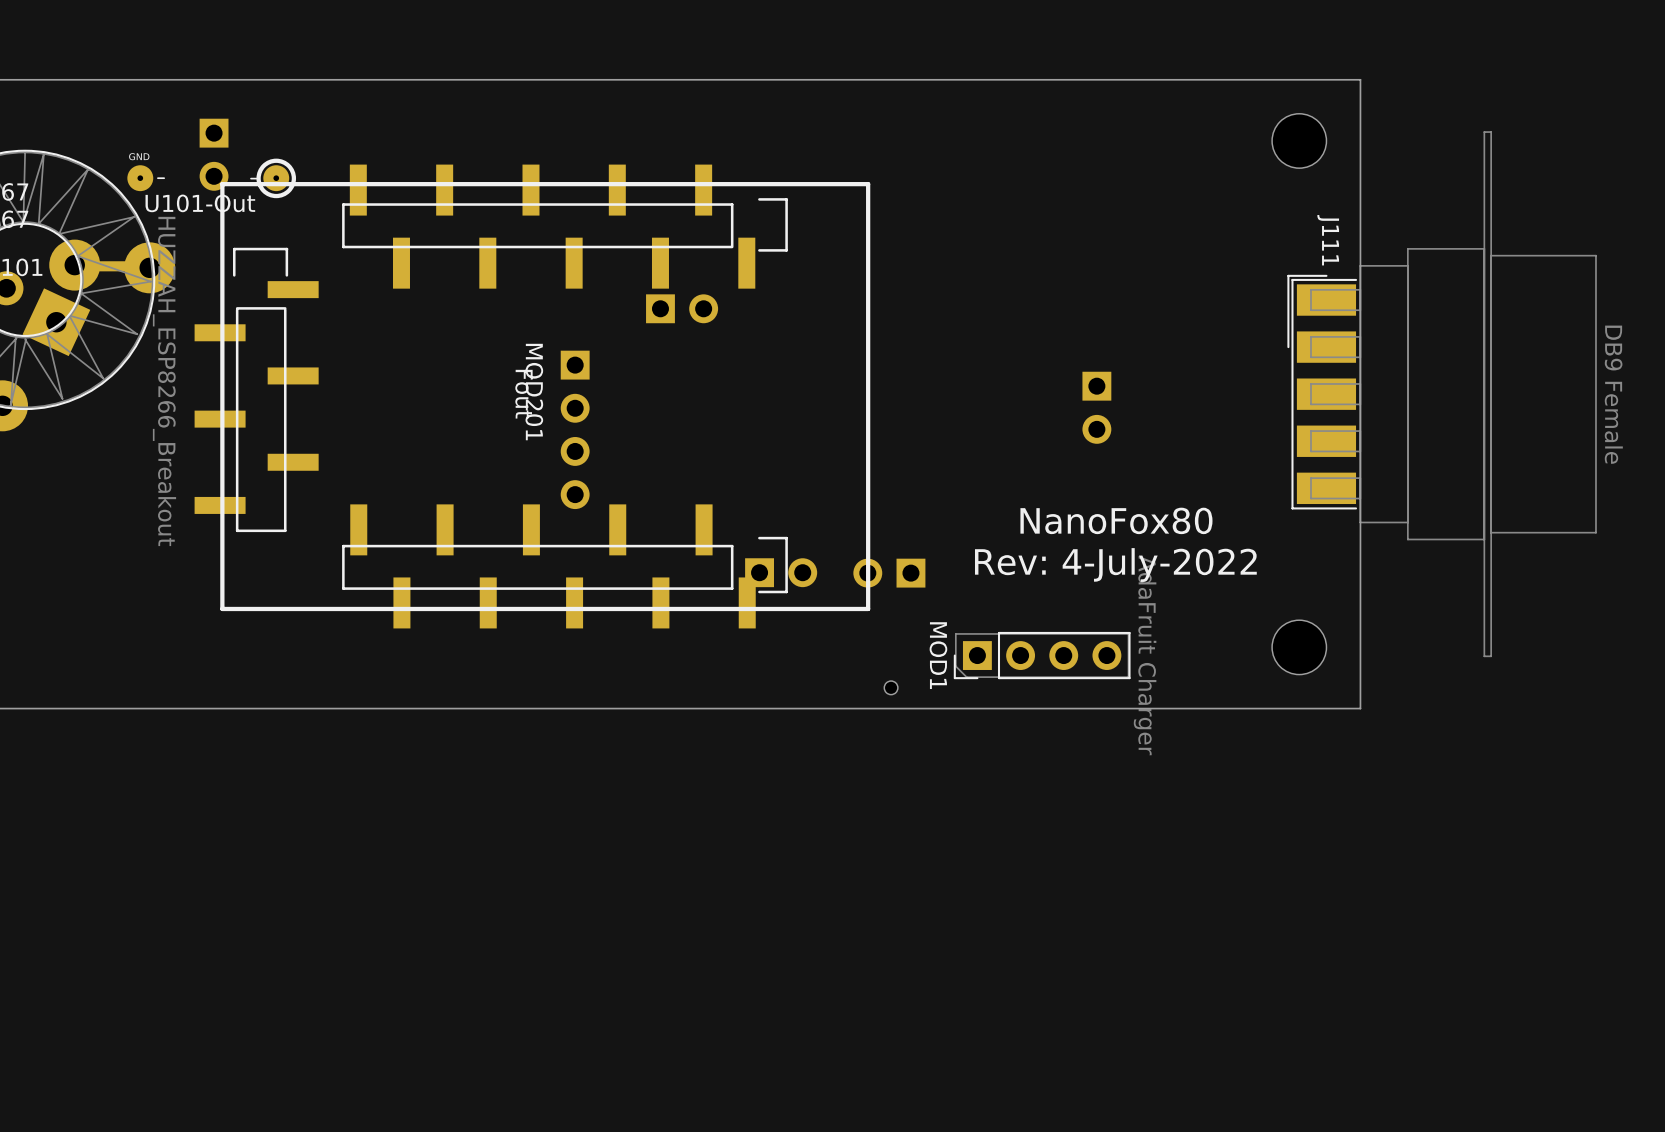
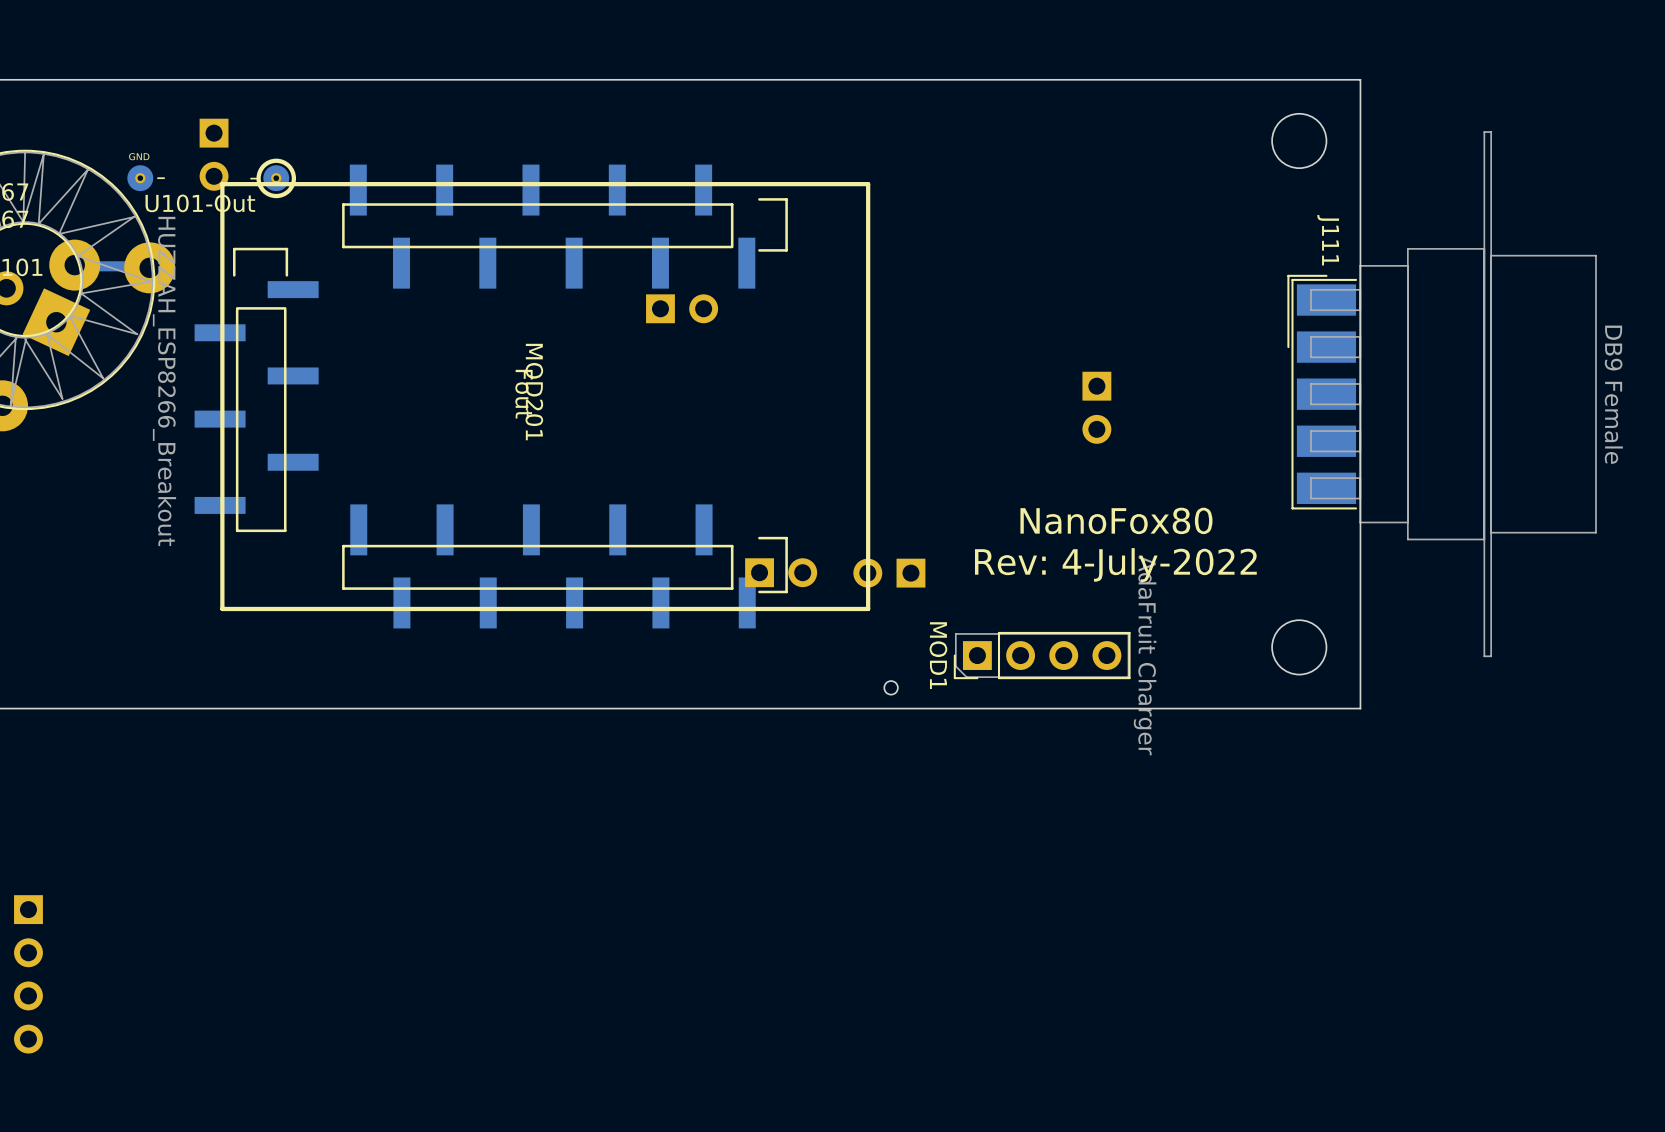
part: (575, 429) -> none
part: none -> (28, 974)

